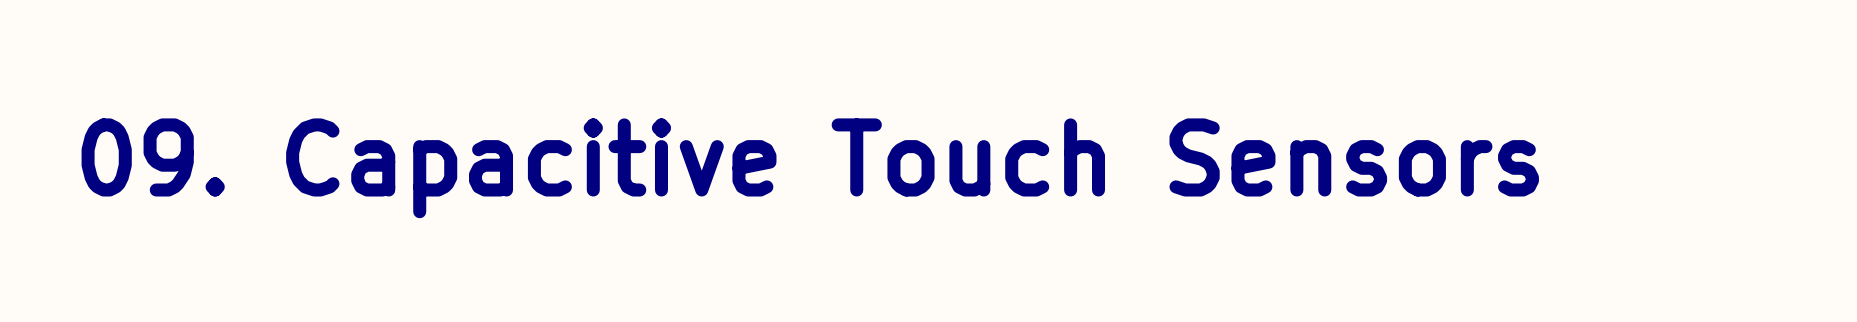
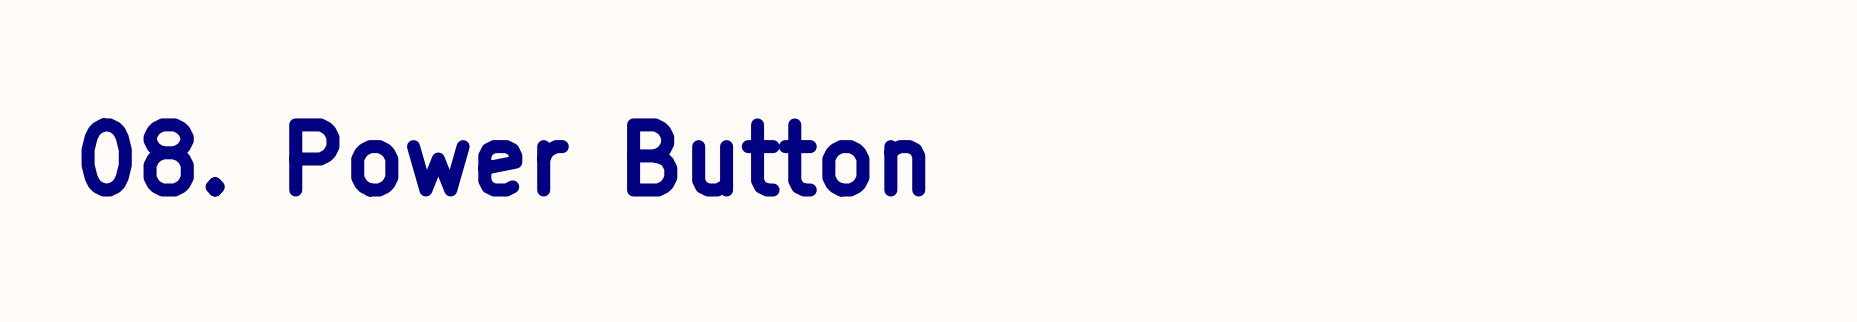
text: 09. Capacitive Touch Sensors (810, 168) -> 08. Power Button (503, 157)

